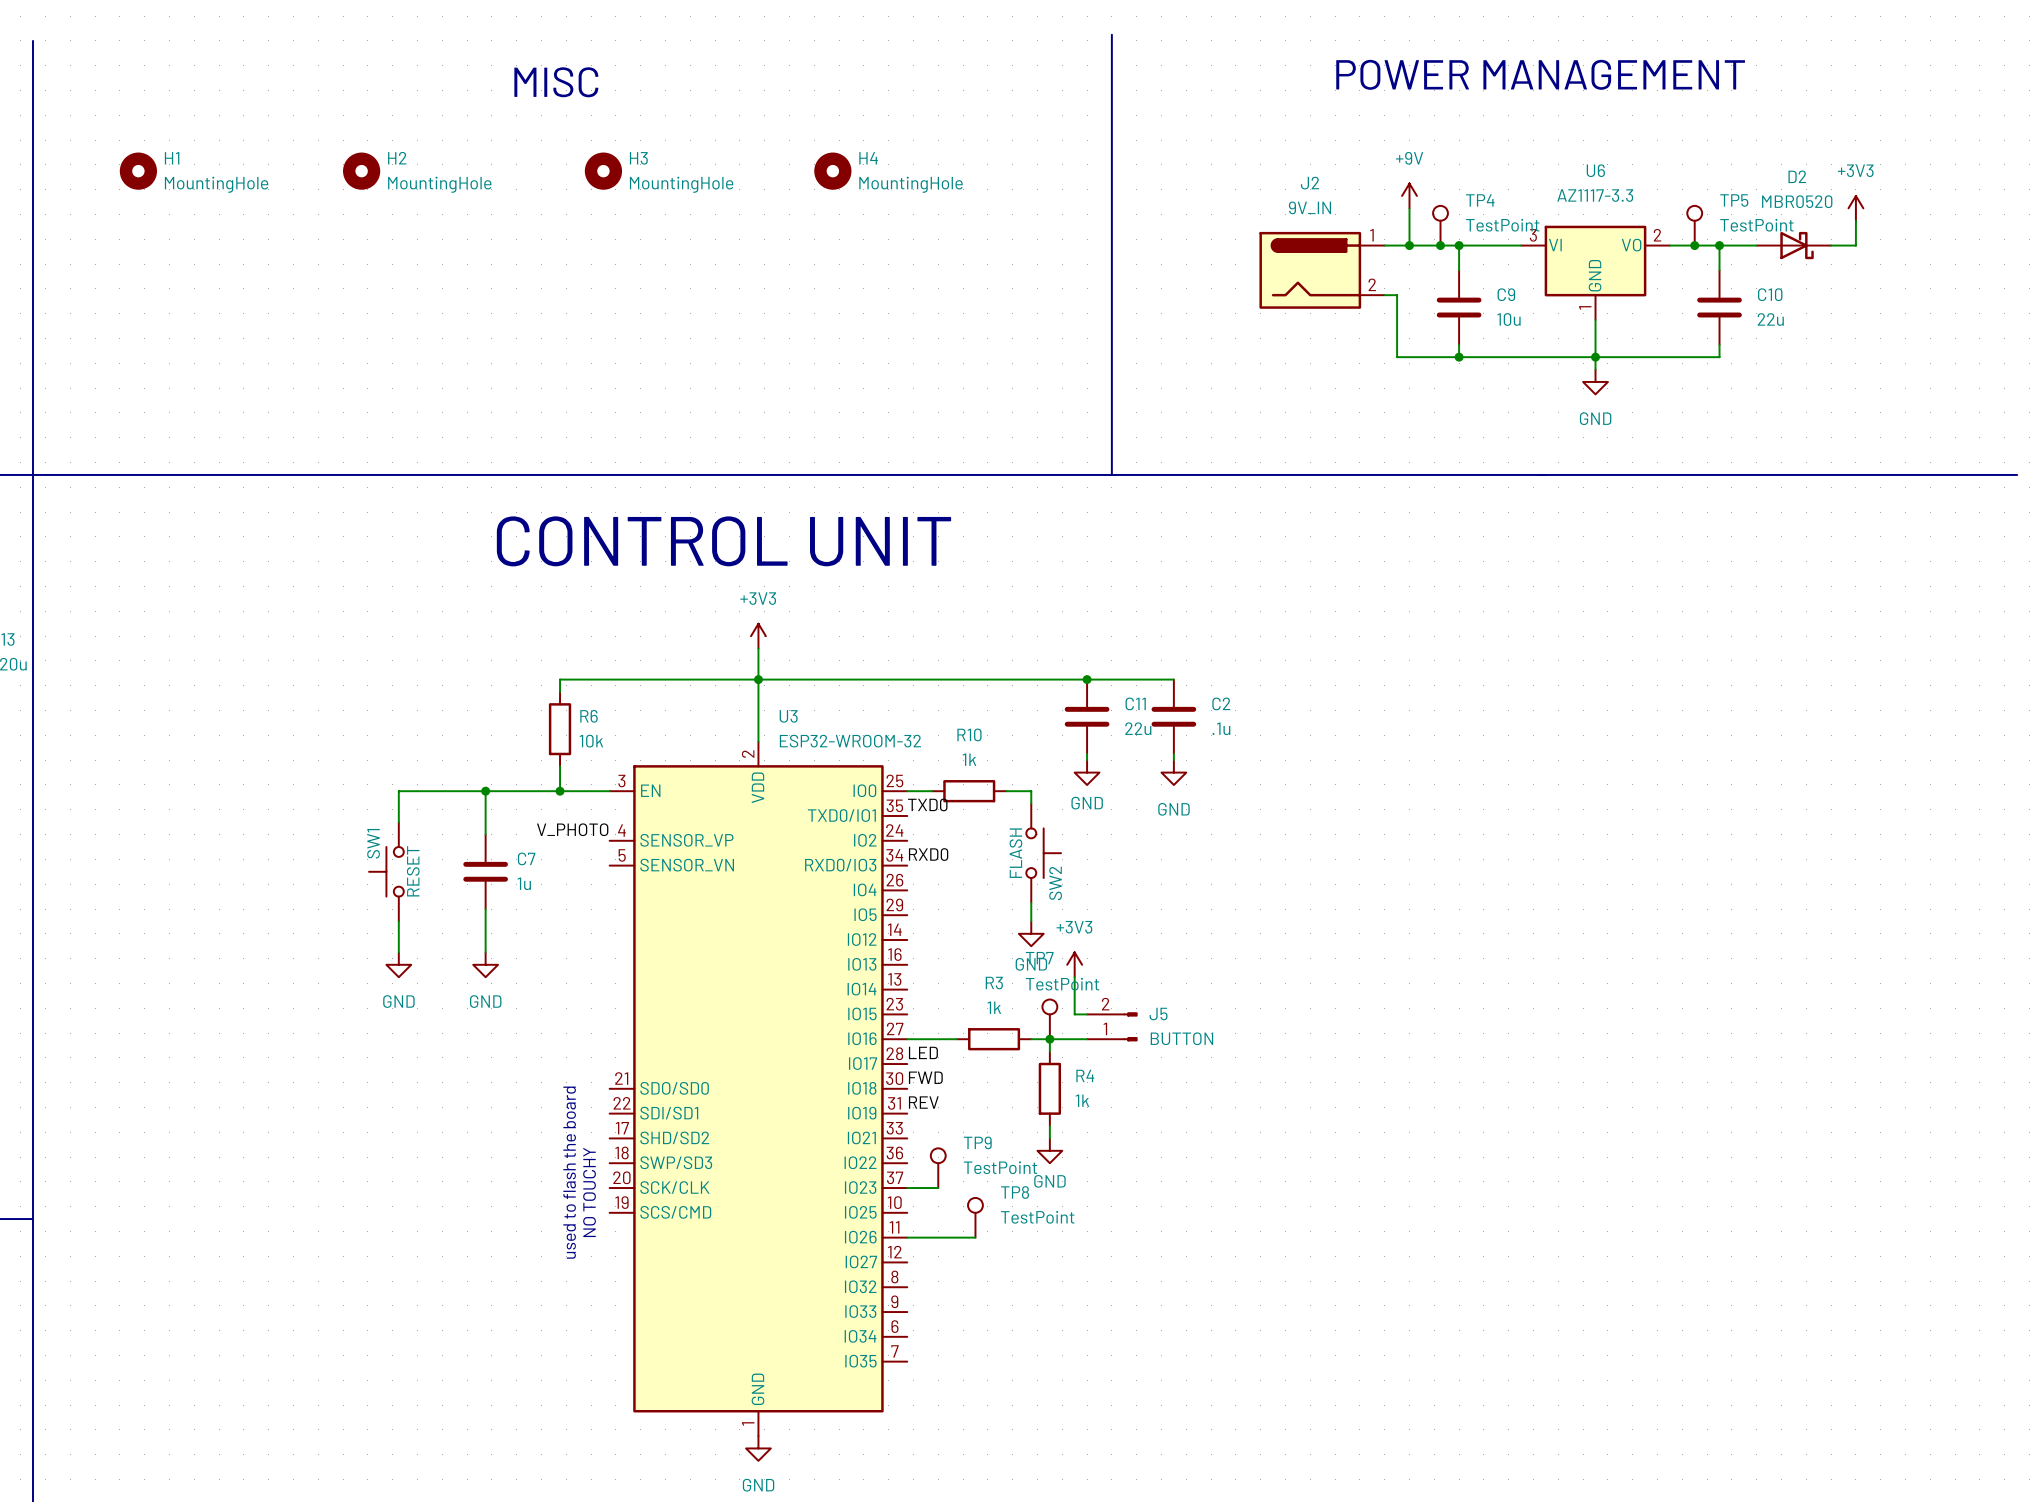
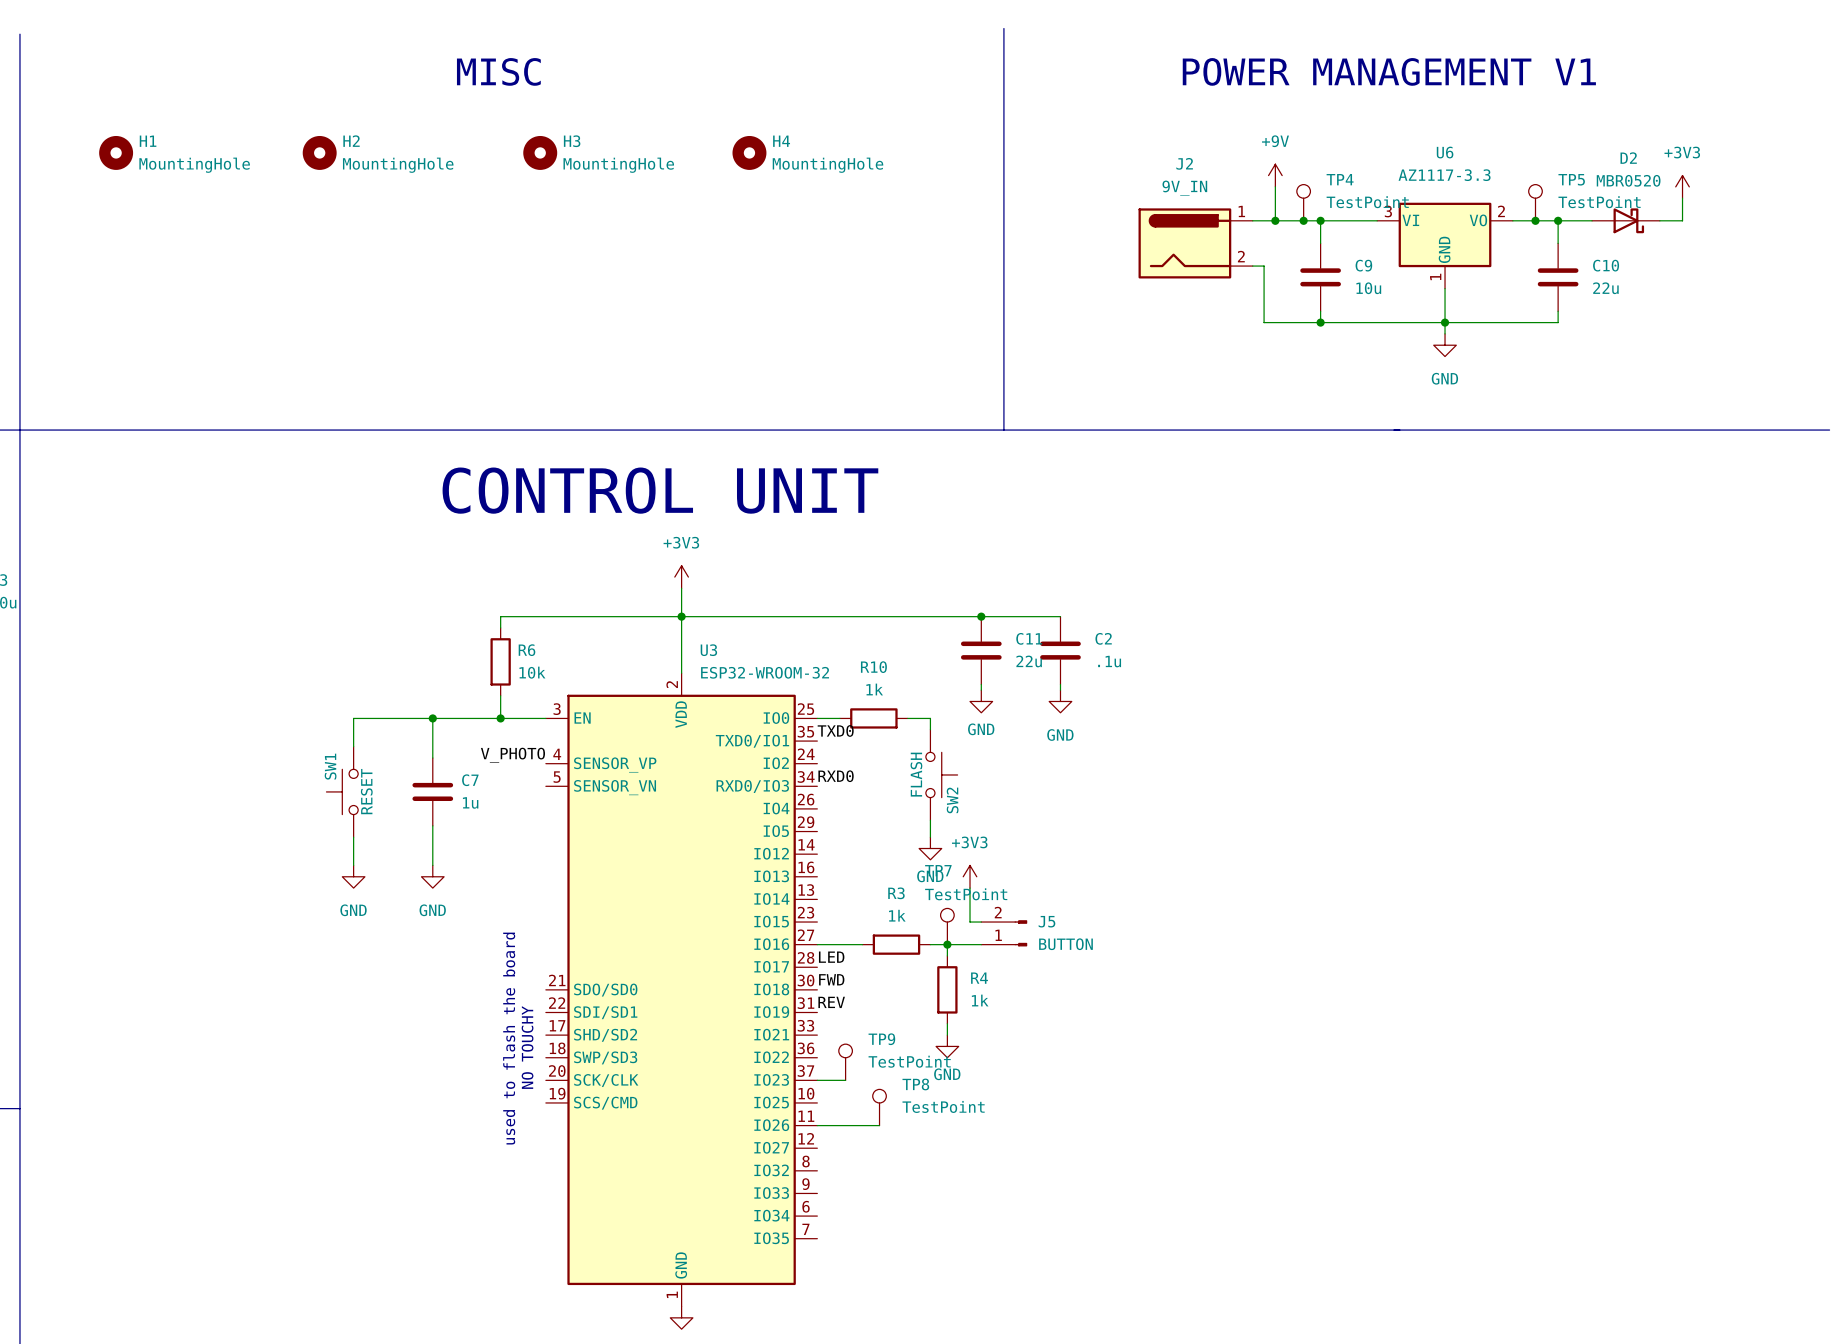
text: POWER MANAGEMENT (1540, 74) -> POWER MANAGEMENT V1 (1389, 71)

